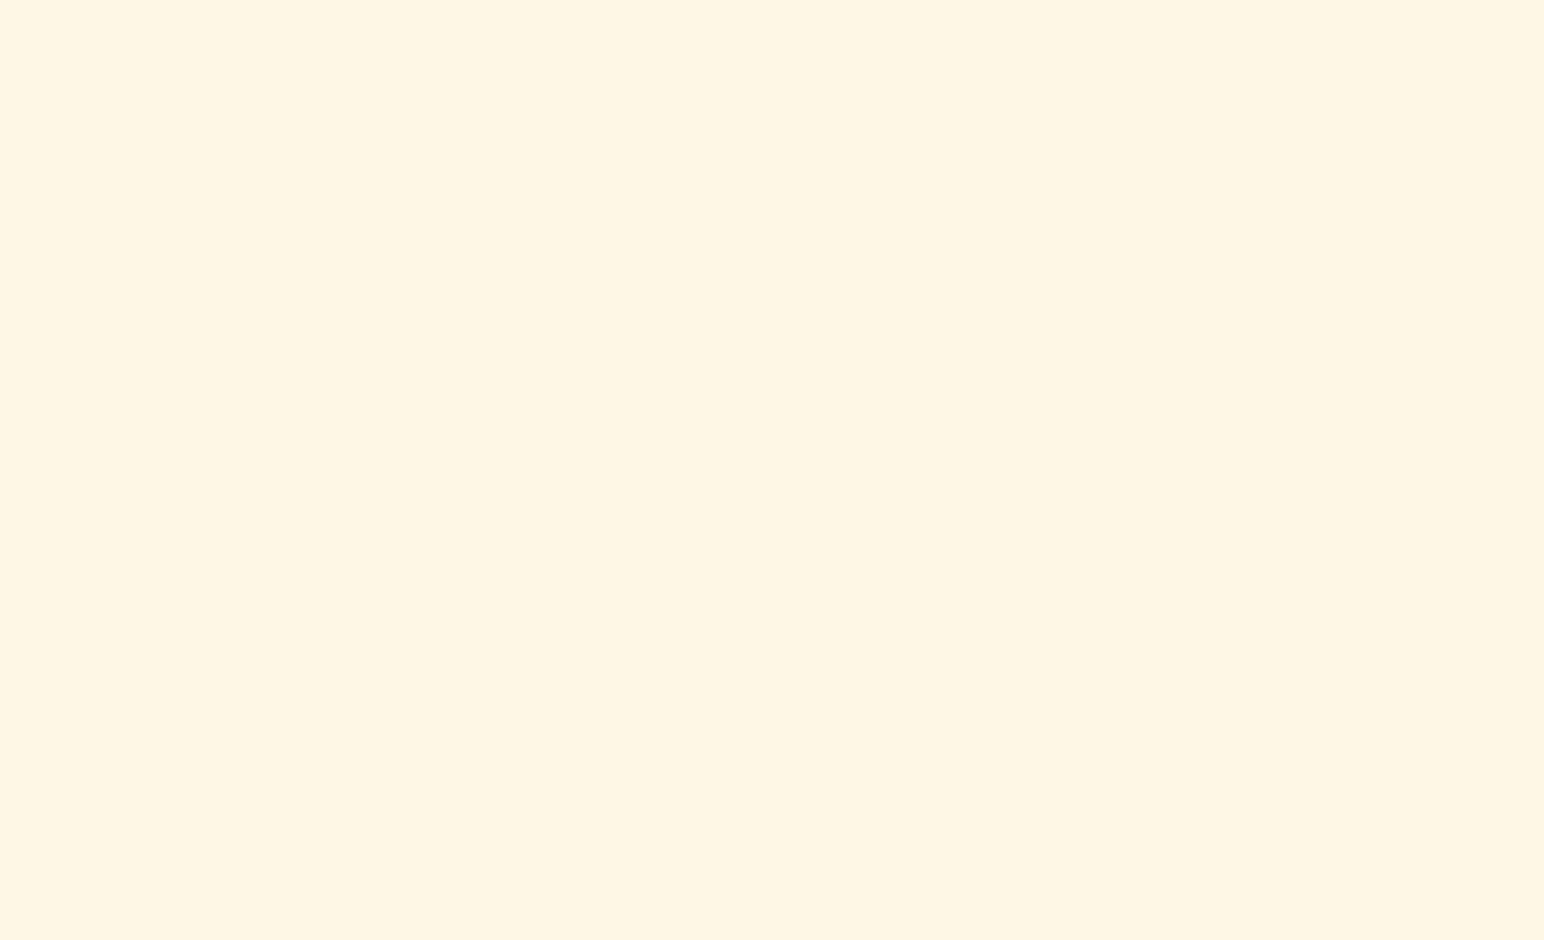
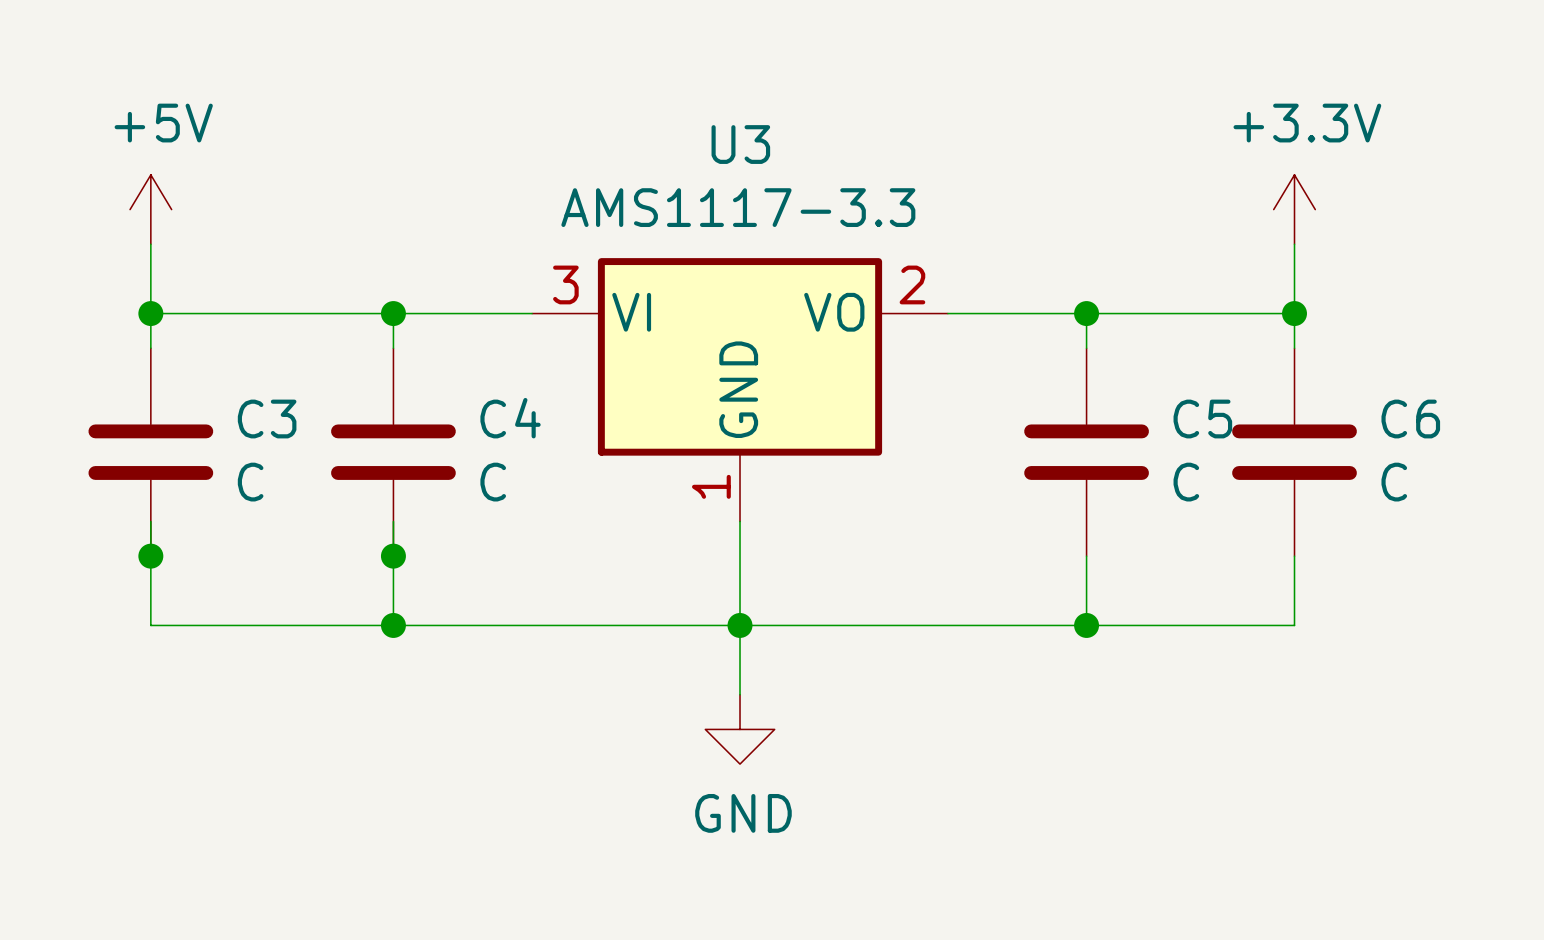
power symbol: none -> +5V (150, 209)
power symbol: none -> +3.3V (1294, 209)
wire: none -> (150, 244) (150, 348)
wire: none -> (1294, 244) (1294, 348)
wire: none -> (150, 313) (532, 313)
junction: none -> (150, 313)
wire: none -> (393, 313) (393, 348)
junction: none -> (393, 313)
wire: none -> (947, 313) (1294, 313)
wire: none -> (1086, 313) (1086, 348)
junction: none -> (1086, 313)
junction: none -> (1294, 313)
U3: none -> AMS1117-3.3 (740, 389)
C3: none -> C (150, 452)
C4: none -> C (393, 452)
C5: none -> C (1086, 452)
C6: none -> C (1294, 452)
wire: none -> (150, 521) (150, 625) (1294, 625) (1294, 556)
wire: none -> (393, 521) (393, 625)
wire: none -> (740, 521) (740, 694)
junction: none -> (150, 556)
junction: none -> (393, 556)
wire: none -> (1086, 556) (1086, 625)
junction: none -> (393, 625)
junction: none -> (740, 625)
junction: none -> (1086, 625)
power symbol: none -> GND (740, 729)

